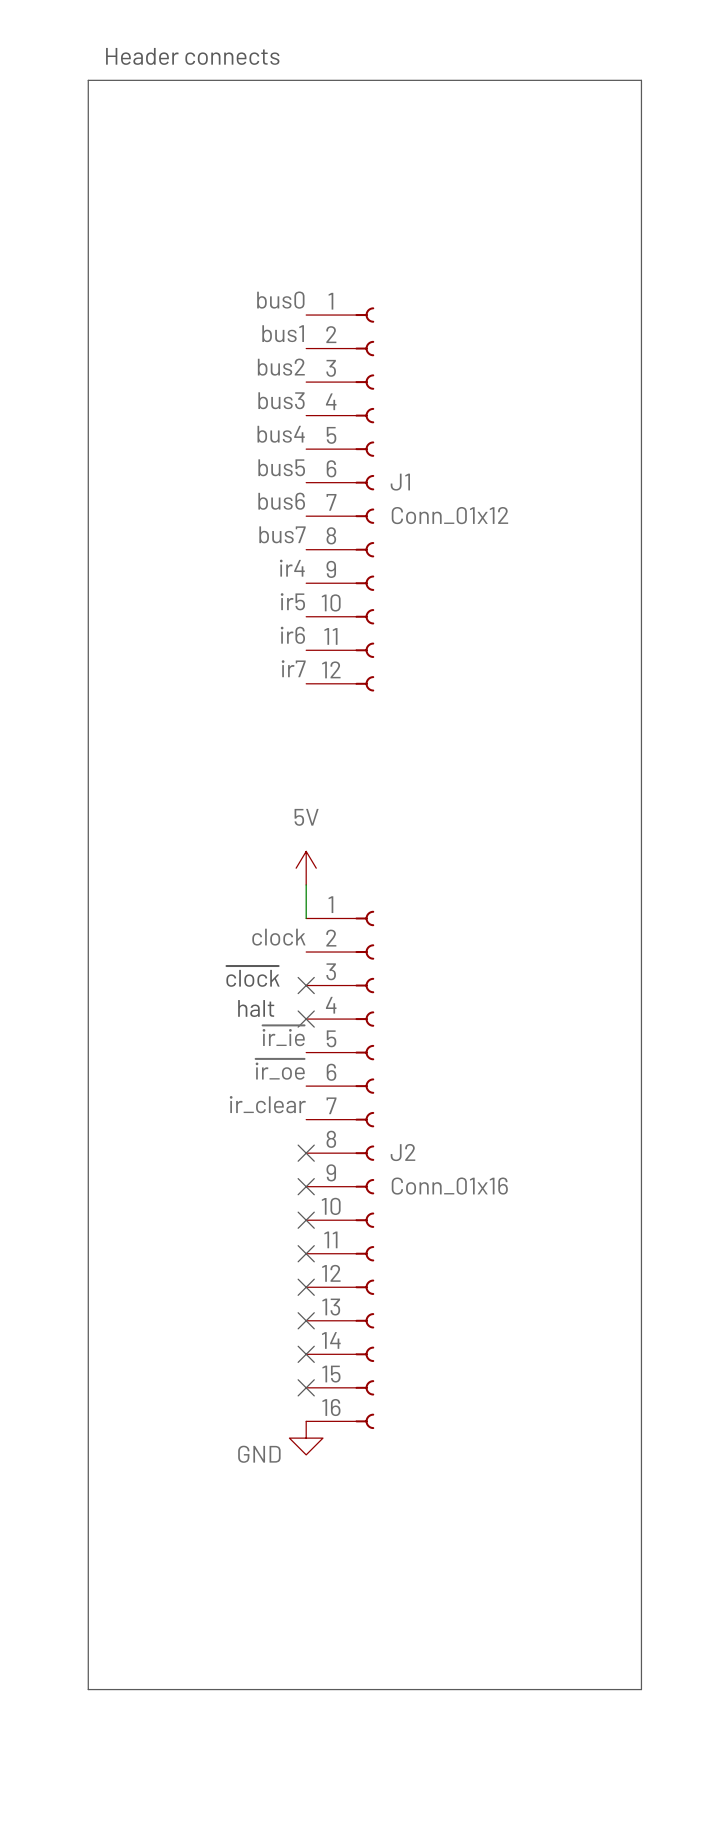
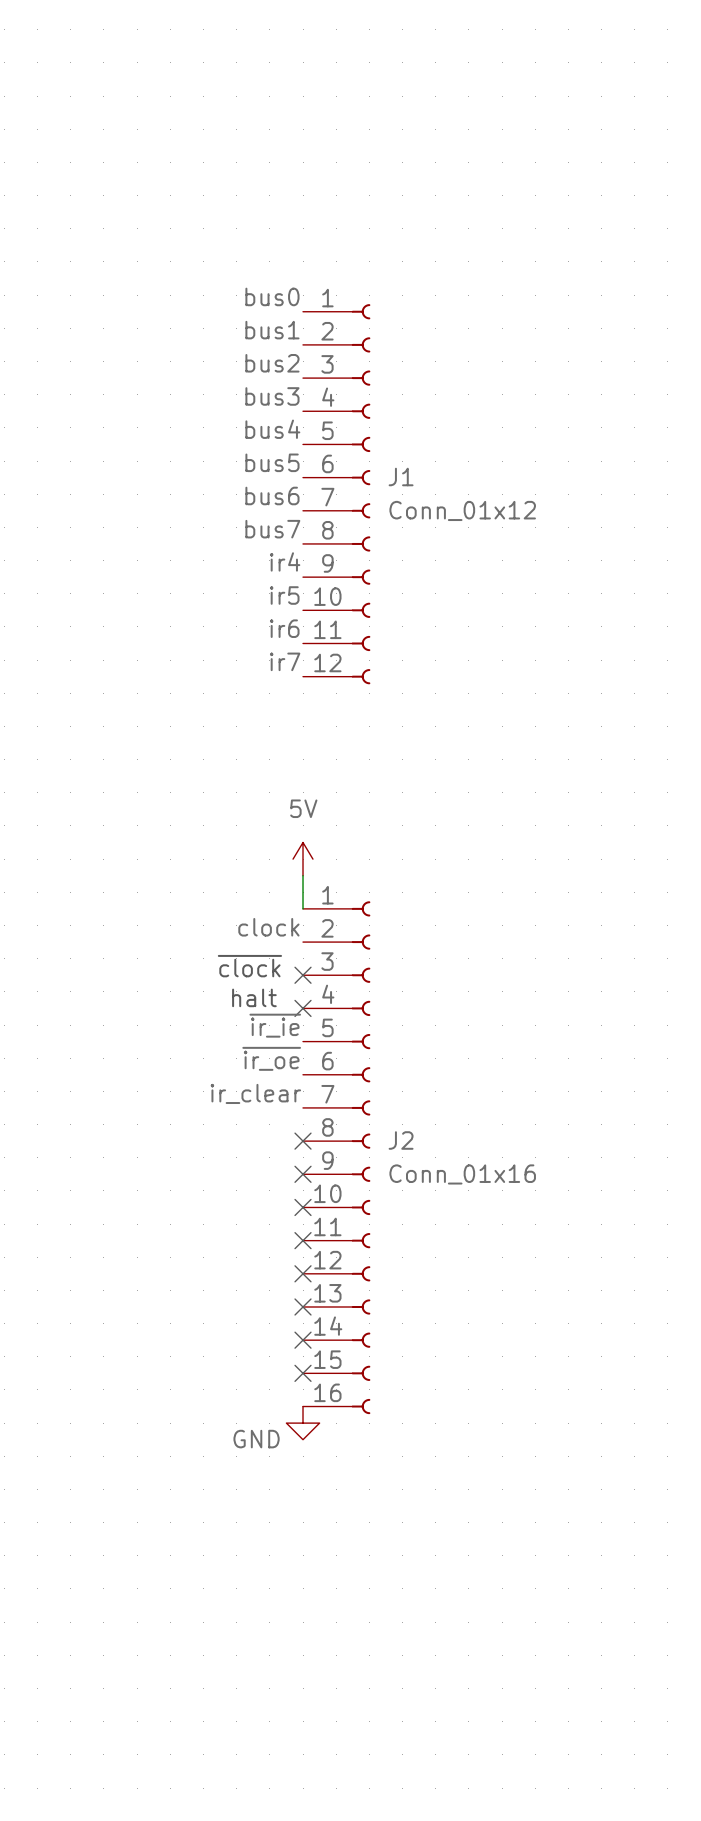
text: Header connects (192, 56) -> none
line: (88, 80) (641, 80) (641, 1689) (88, 1689) (88, 80) -> none

